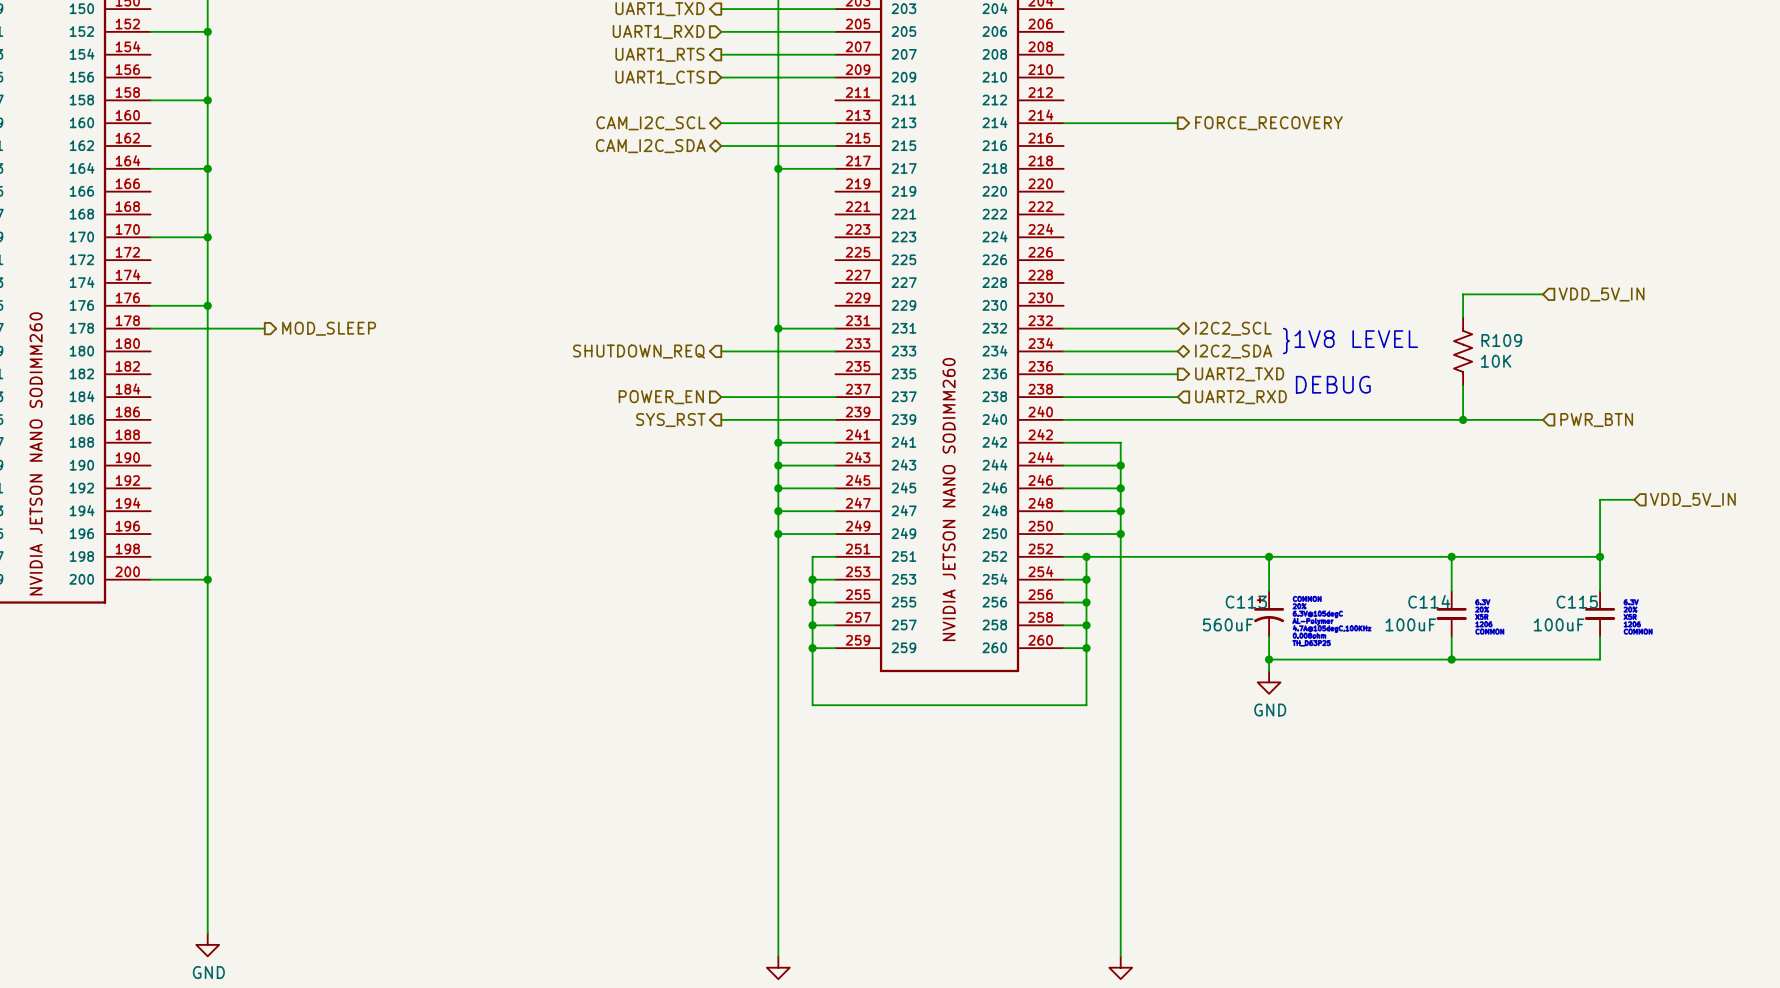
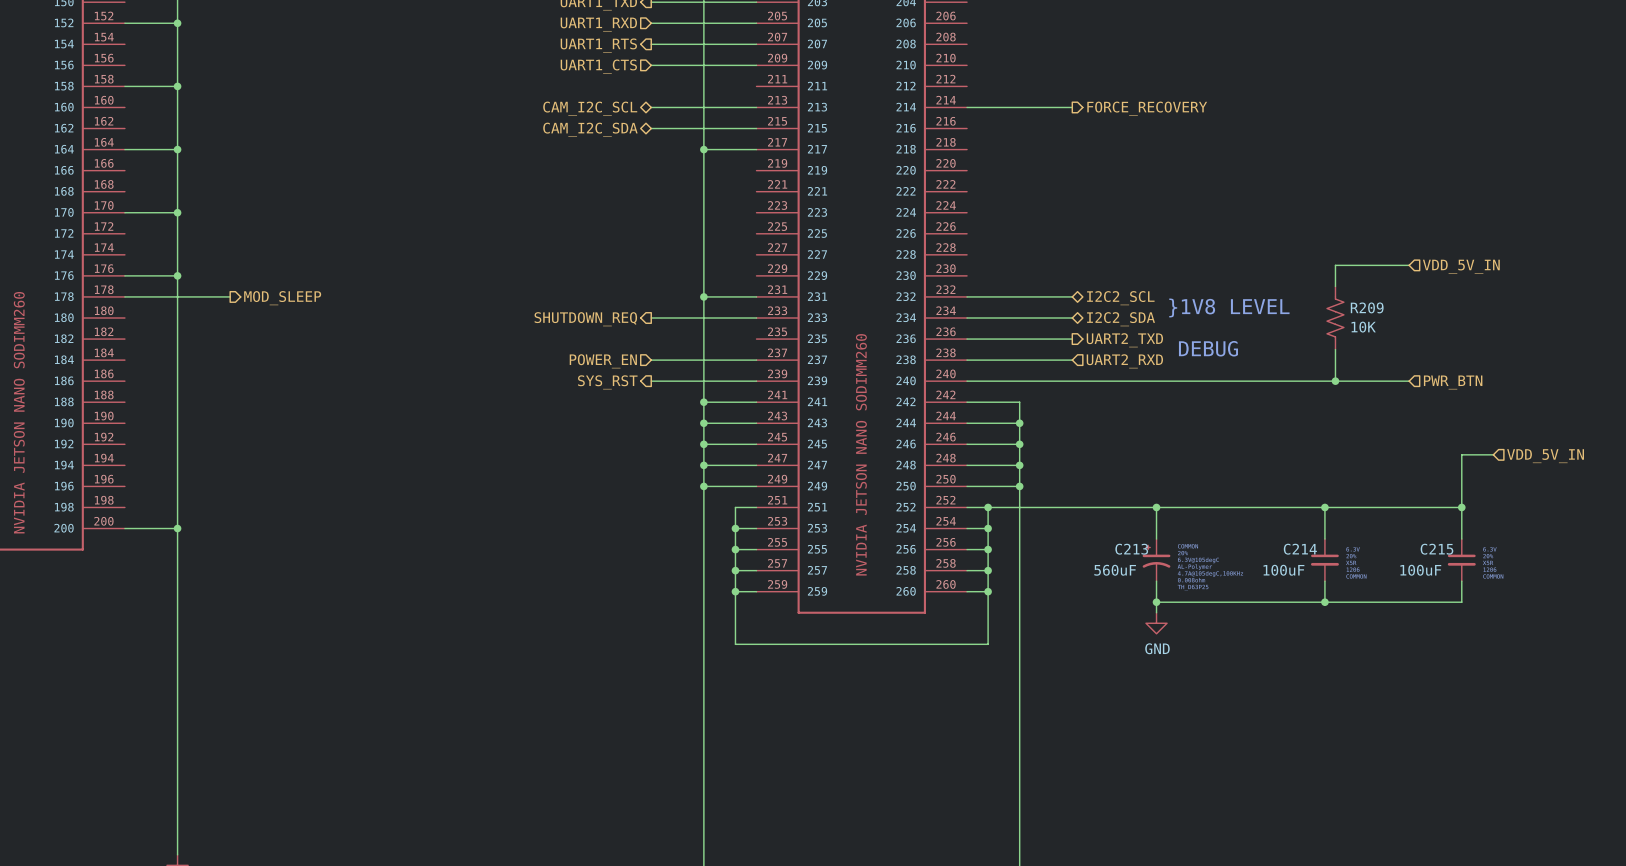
R109 name: R109 (1501, 340) -> R209 (1367, 307)
C114 name: C114 (1429, 601) -> C214 (1300, 549)
C113 name: C113 (1246, 602) -> C213 (1131, 549)
C115 name: C115 (1577, 602) -> C215 (1436, 549)

